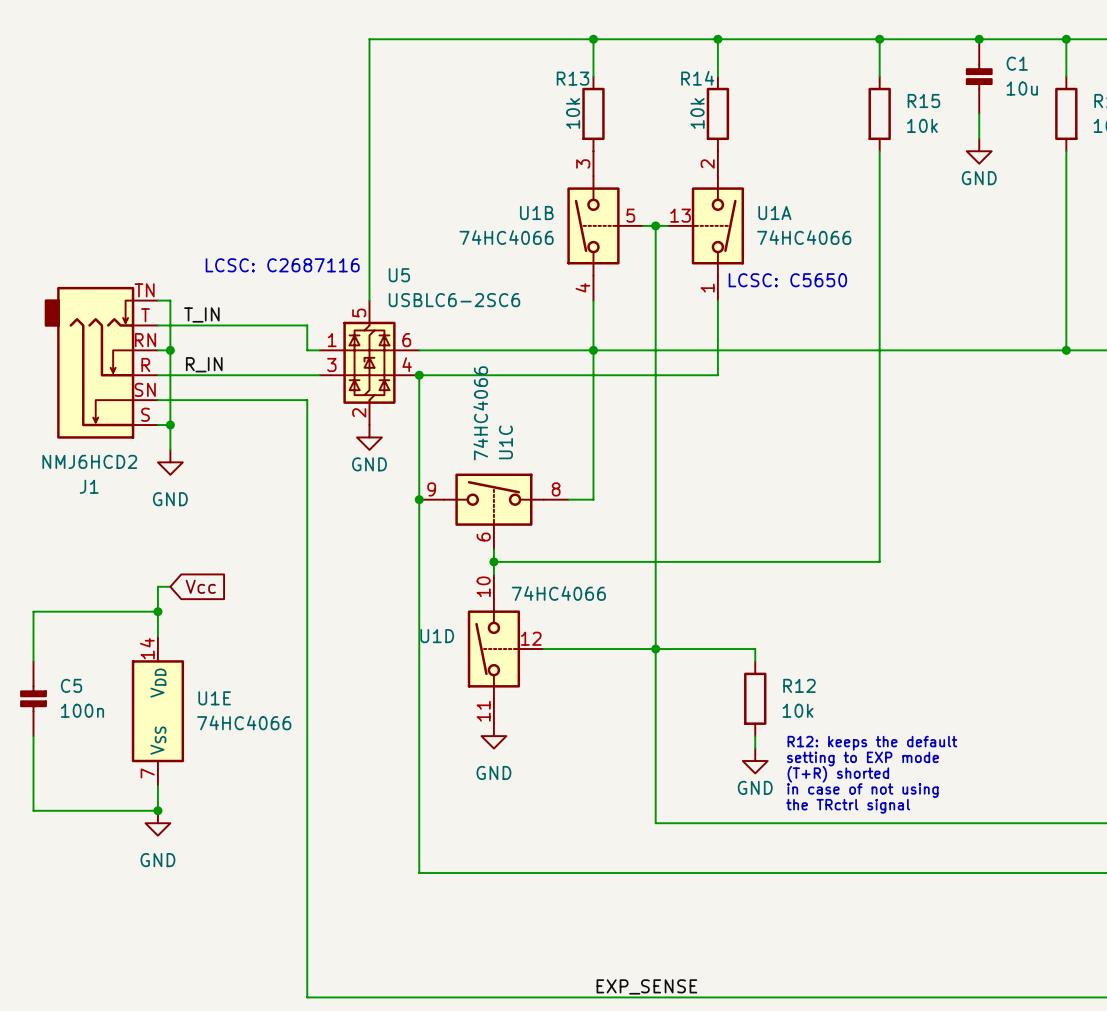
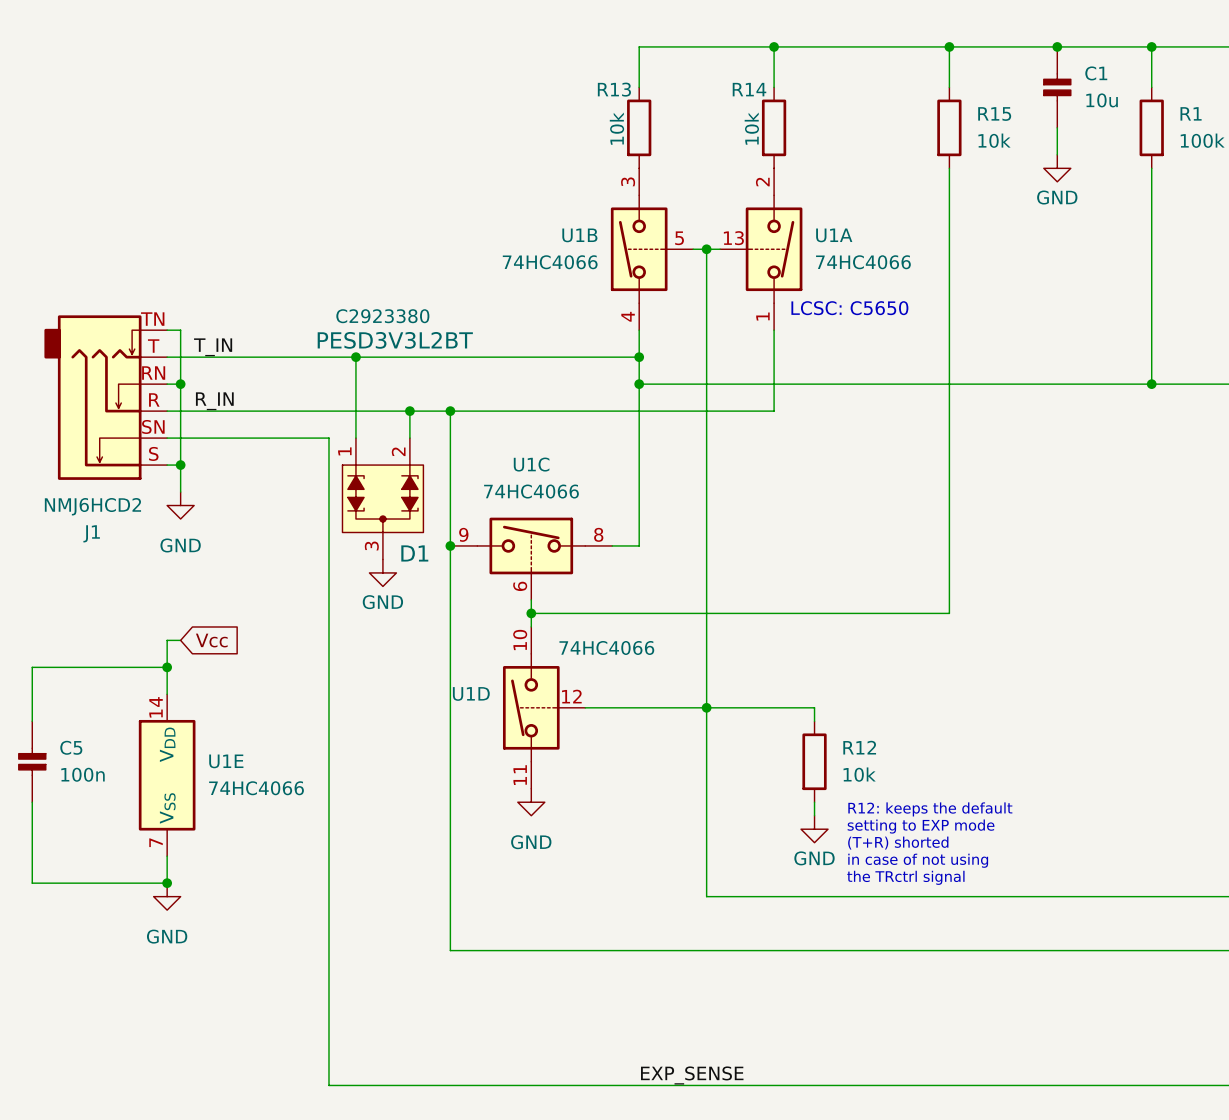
wire: (593, 39) (369, 39) (369, 300) -> none
junction: (593, 39) -> none
text: LCSC: C2687116 (282, 265) -> none
wire: (307, 325) (307, 350) (319, 350) -> (328, 357) (639, 357)
wire: none -> (355, 357) (355, 438)
junction: none -> (355, 357)
junction: none -> (639, 357)
wire: (419, 350) (593, 350) -> none
U5: USBLC6-2SC6 (369, 362) -> none
junction: none -> (409, 411)
U1C value rotation: 0° (480, 413) -> 90° clockwise (531, 491)
power symbol position: GND (369, 437) -> GND (382, 572)
U1C name rotation: 0° (505, 442) -> 90° clockwise (531, 464)
D1: none -> PESD3V3L2BT (382, 498)

